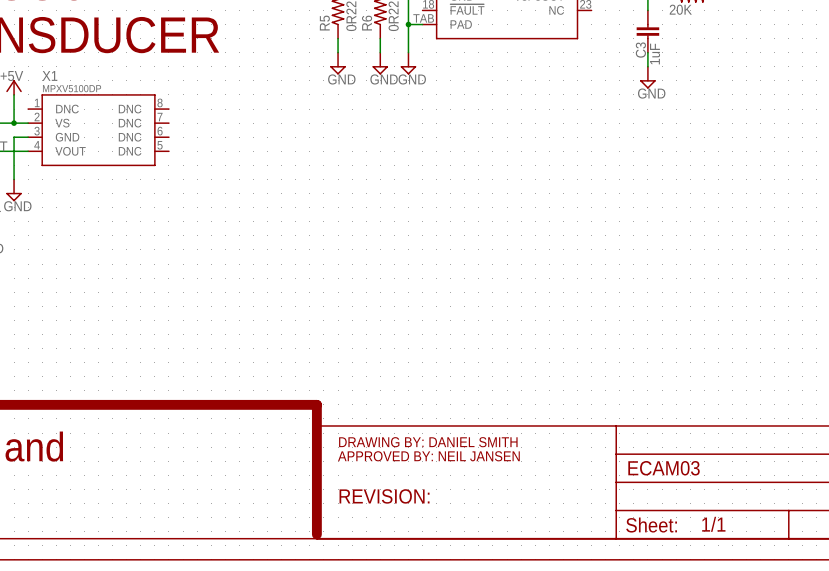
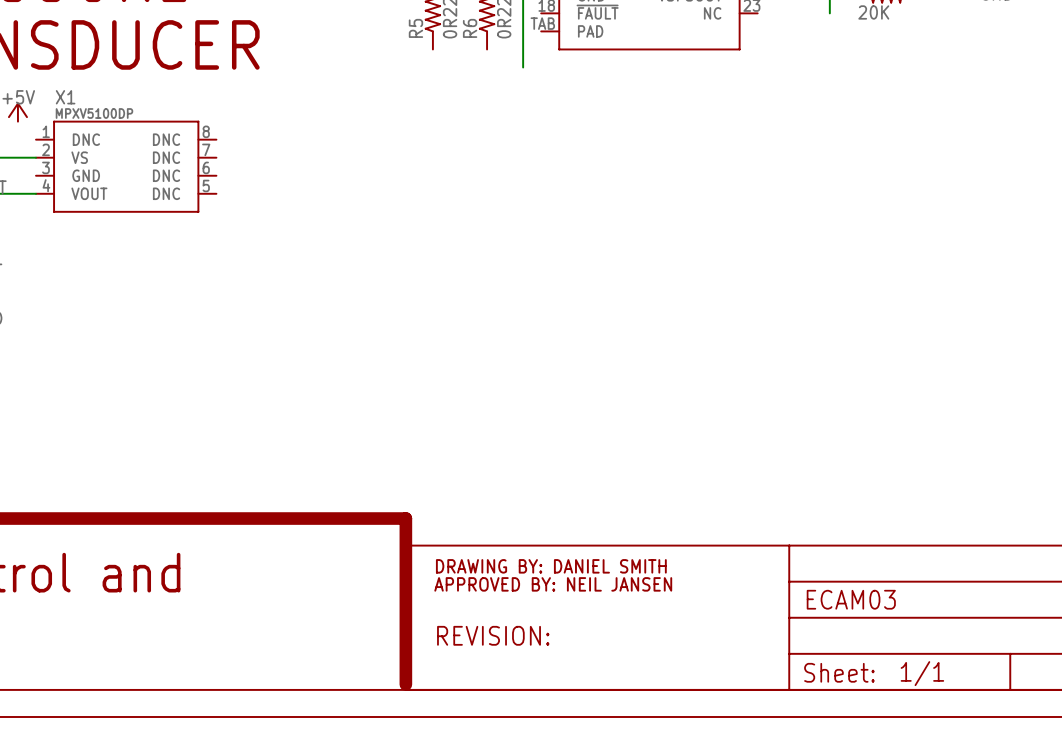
wire: (408, 24) (422, 24) -> none
junction: (408, 24) -> none
C3: 1uF (647, 31) -> none
wire: (338, 38) (338, 52) -> none
wire: (380, 38) (380, 52) -> none
wire: (647, 52) (647, 66) -> none
power symbol: GND (338, 63) -> none
power symbol: GND (380, 63) -> none
power symbol: GND (408, 63) -> none
power symbol: GND (647, 77) -> none
wire: (14, 94) (14, 123) -> none
junction: (14, 123) -> none
wire: (28, 137) (14, 137) (14, 179) -> none
power symbol: GND (14, 190) -> none

